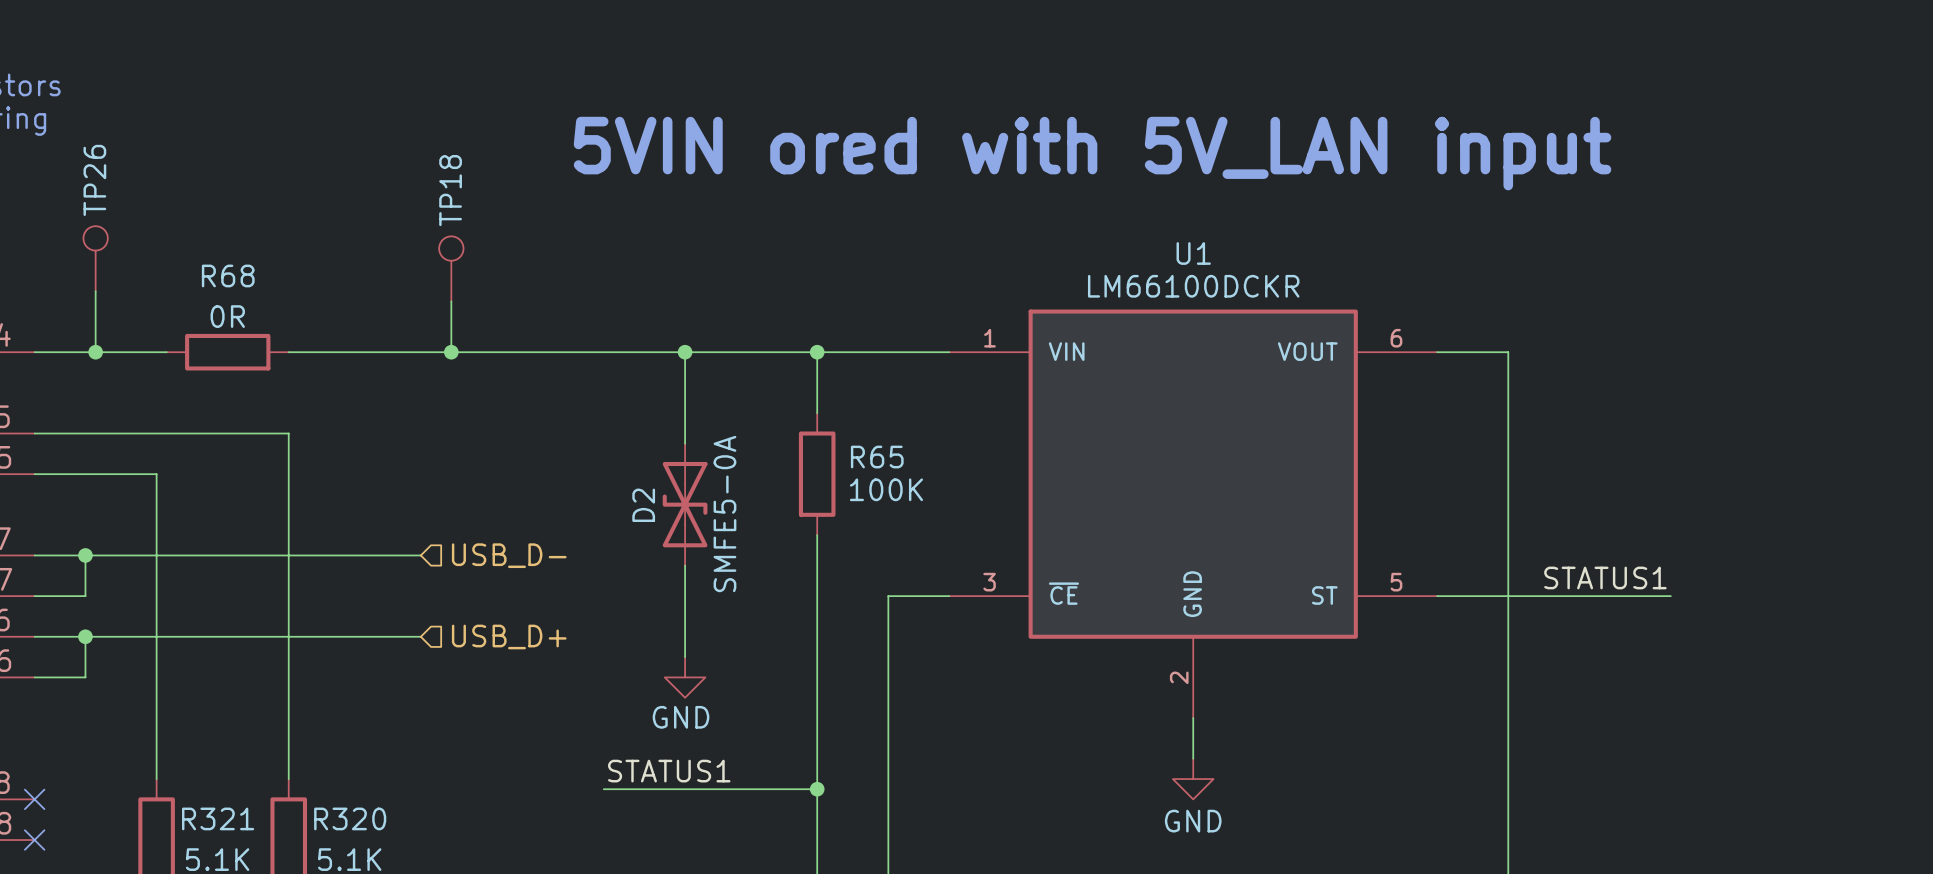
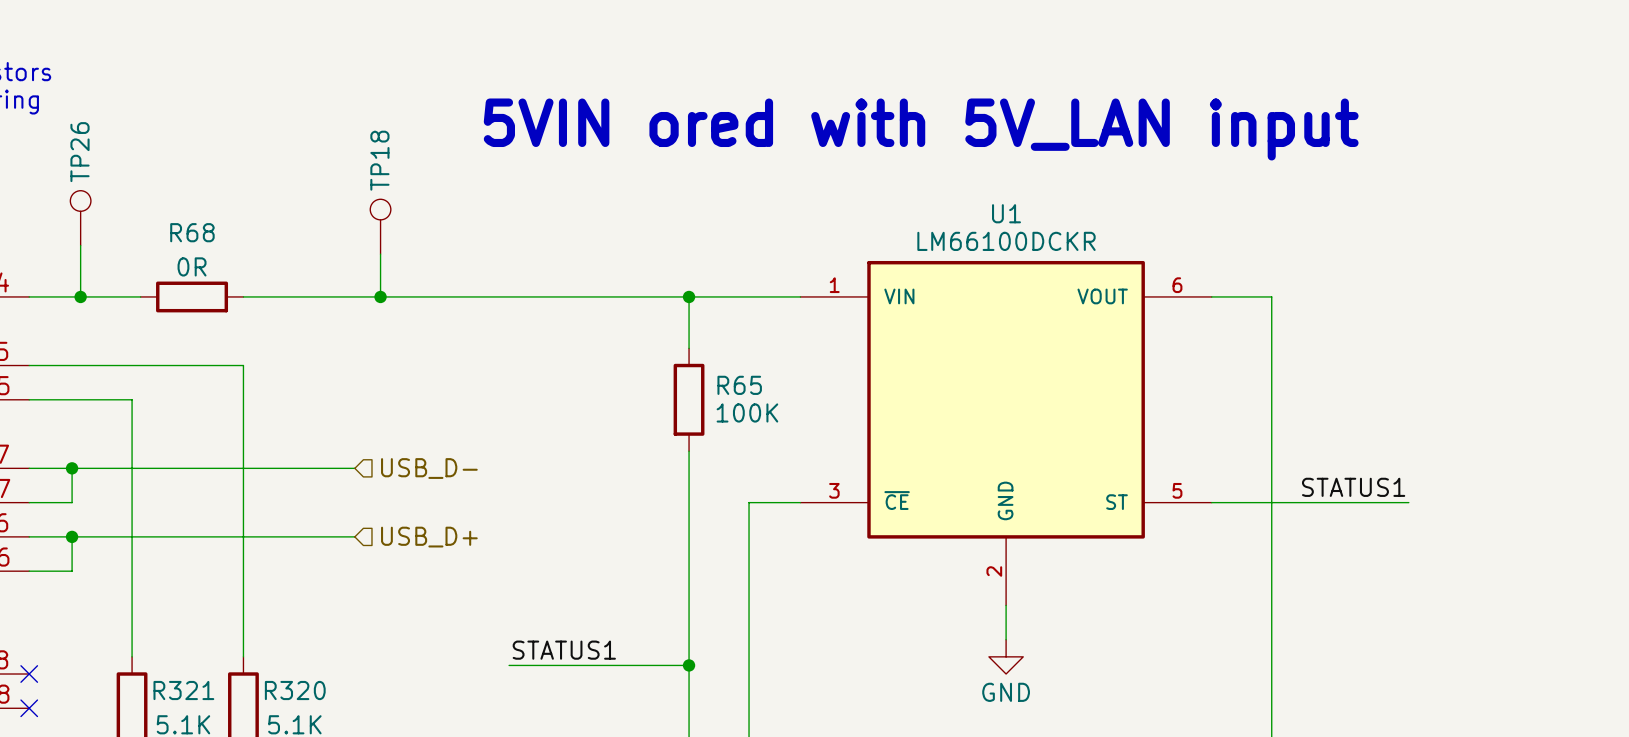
wire: (685, 352) (685, 443) -> none
junction: (685, 352) -> none
D2: SMFE5-0A (685, 504) -> none
wire: (685, 565) (685, 657) -> none
power symbol: GND (685, 677) -> none

